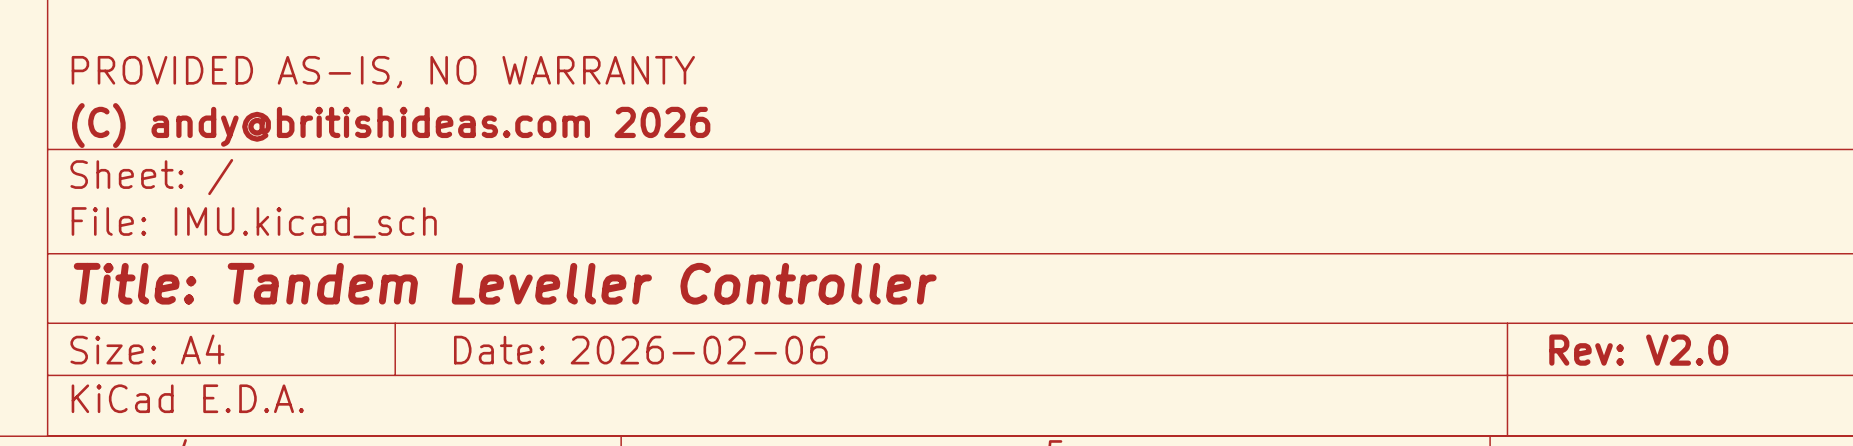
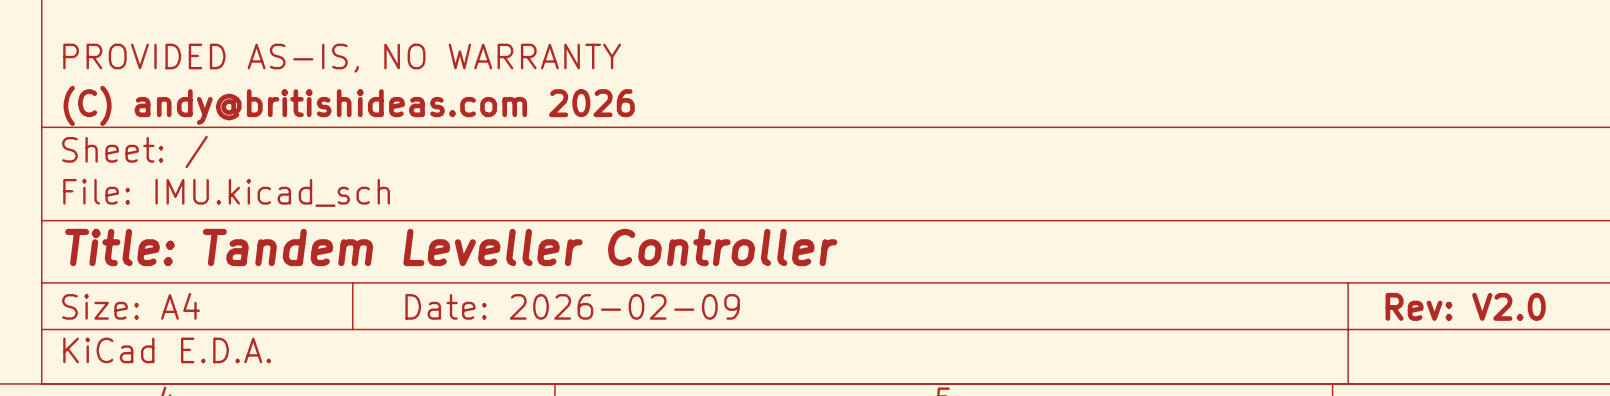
title block: Date: 2026-02-06 (640, 350) -> Date: 2026-02-09 (572, 306)

